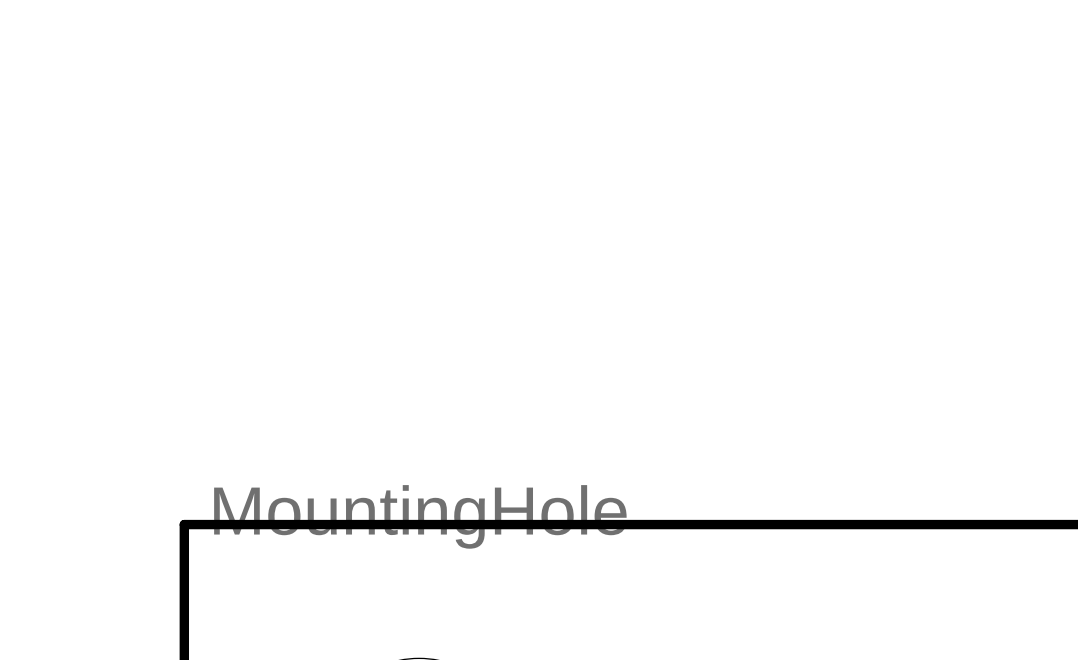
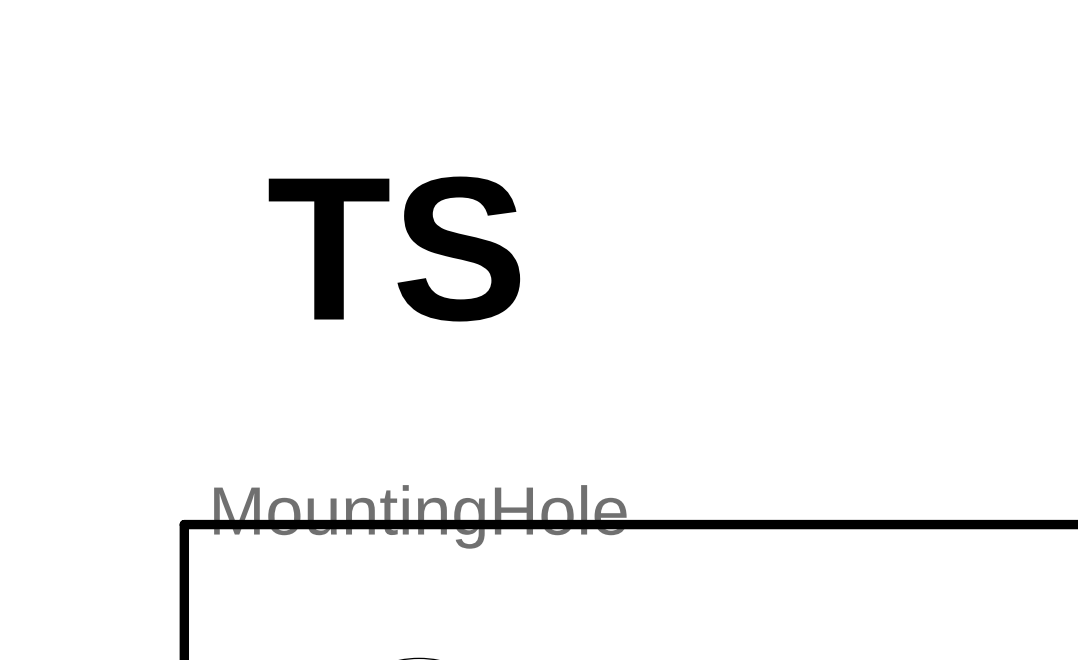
text: none -> TS (394, 249)

